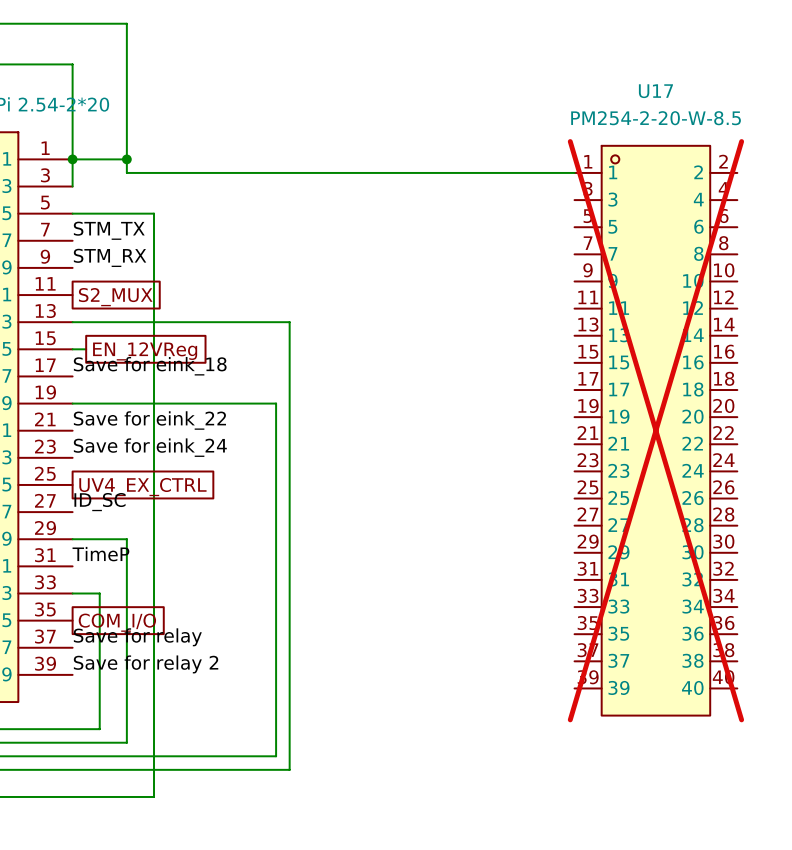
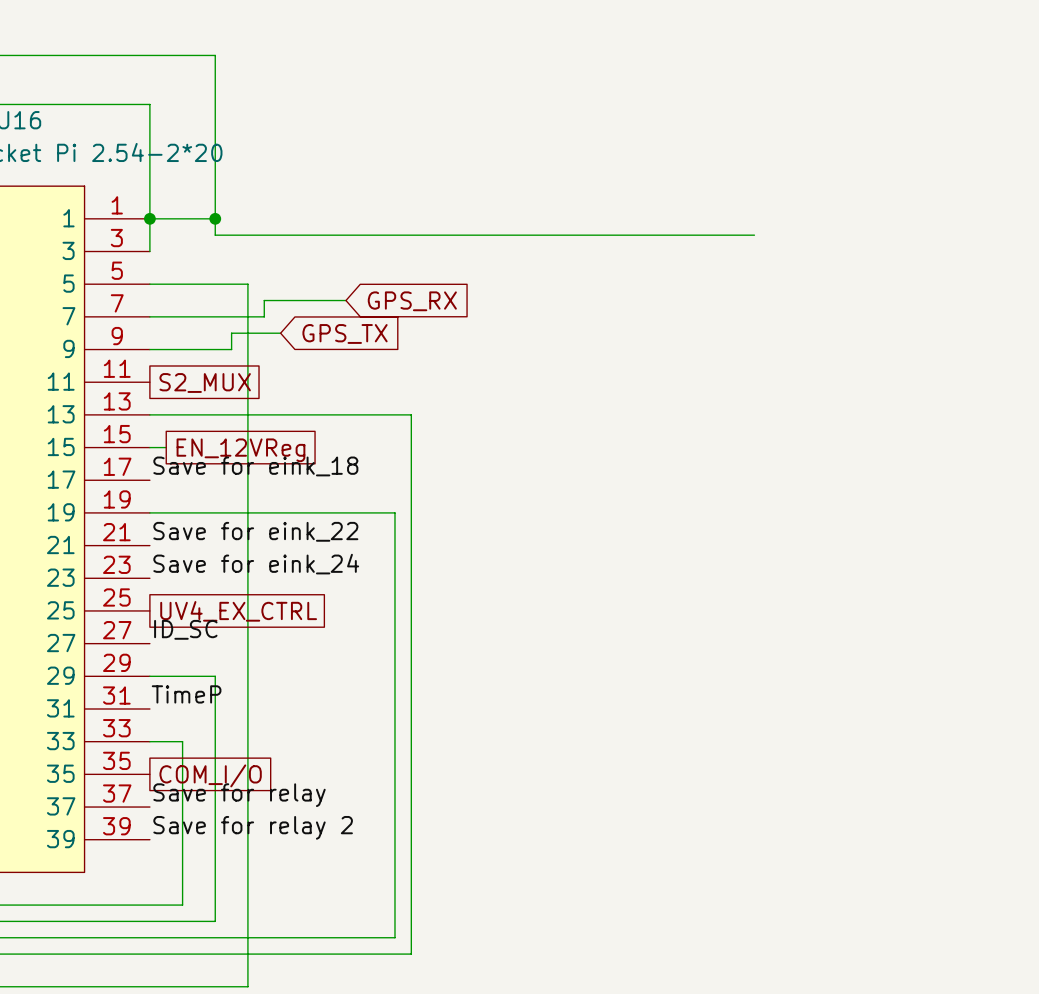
wire: none -> (345, 300) (264, 300) (264, 316) (149, 316)
global label: none -> GPS_RX (412, 301)
label: STM_TX (109, 230) -> none
wire: none -> (280, 333) (231, 333) (231, 349) (149, 349)
global label: none -> GPS_TX (345, 333)
label: STM_RX (110, 257) -> none
U17: PM254-2-20-W-8.5 (655, 430) -> none

